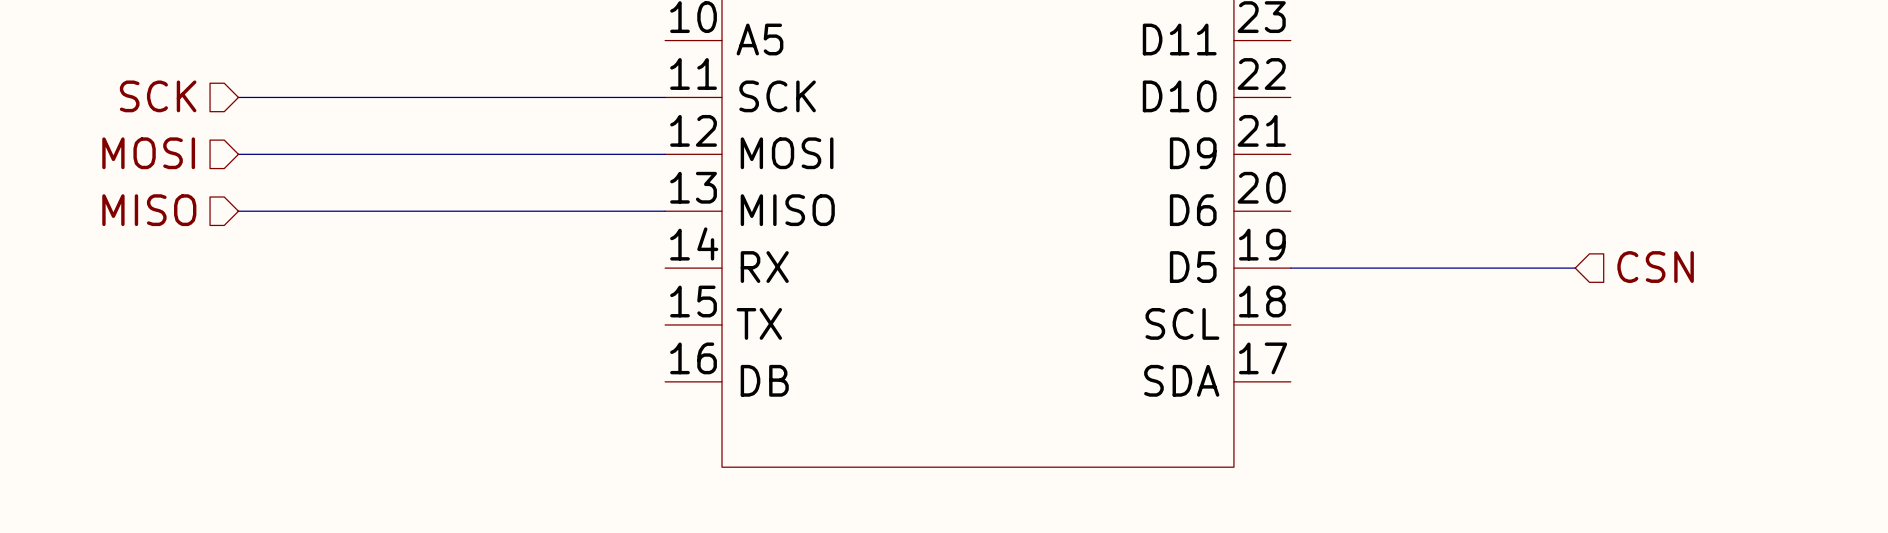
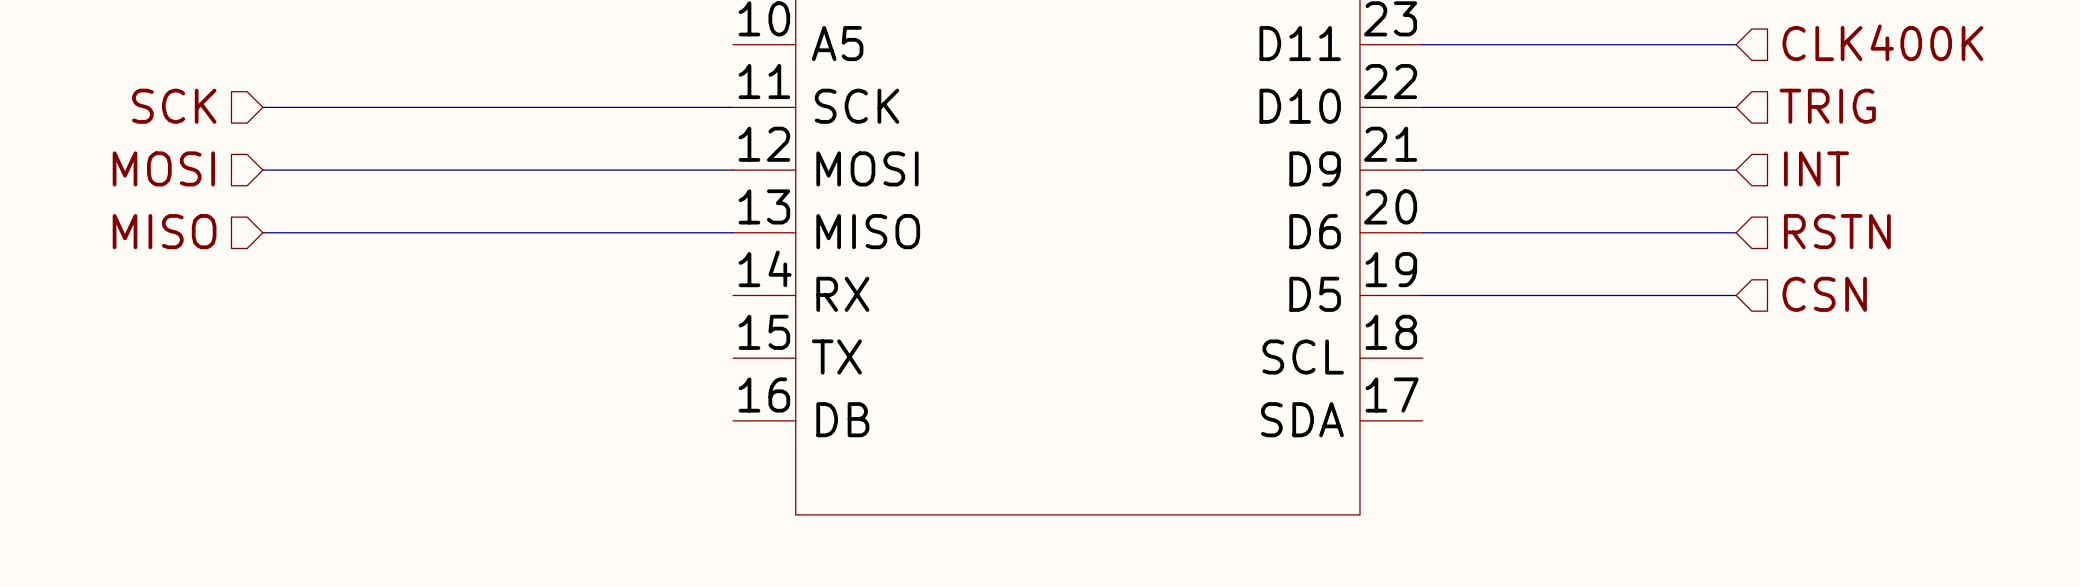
hierarchical label: none -> CLK400K (1882, 42)
wire: none -> (1422, 44) (1736, 44)
hierarchical label: none -> TRIG (1827, 106)
wire: none -> (1422, 107) (1736, 107)
hierarchical label: none -> INT (1816, 168)
wire: none -> (1422, 170) (1736, 170)
hierarchical label: none -> RSTN (1837, 231)
wire: none -> (1422, 232) (1736, 232)

